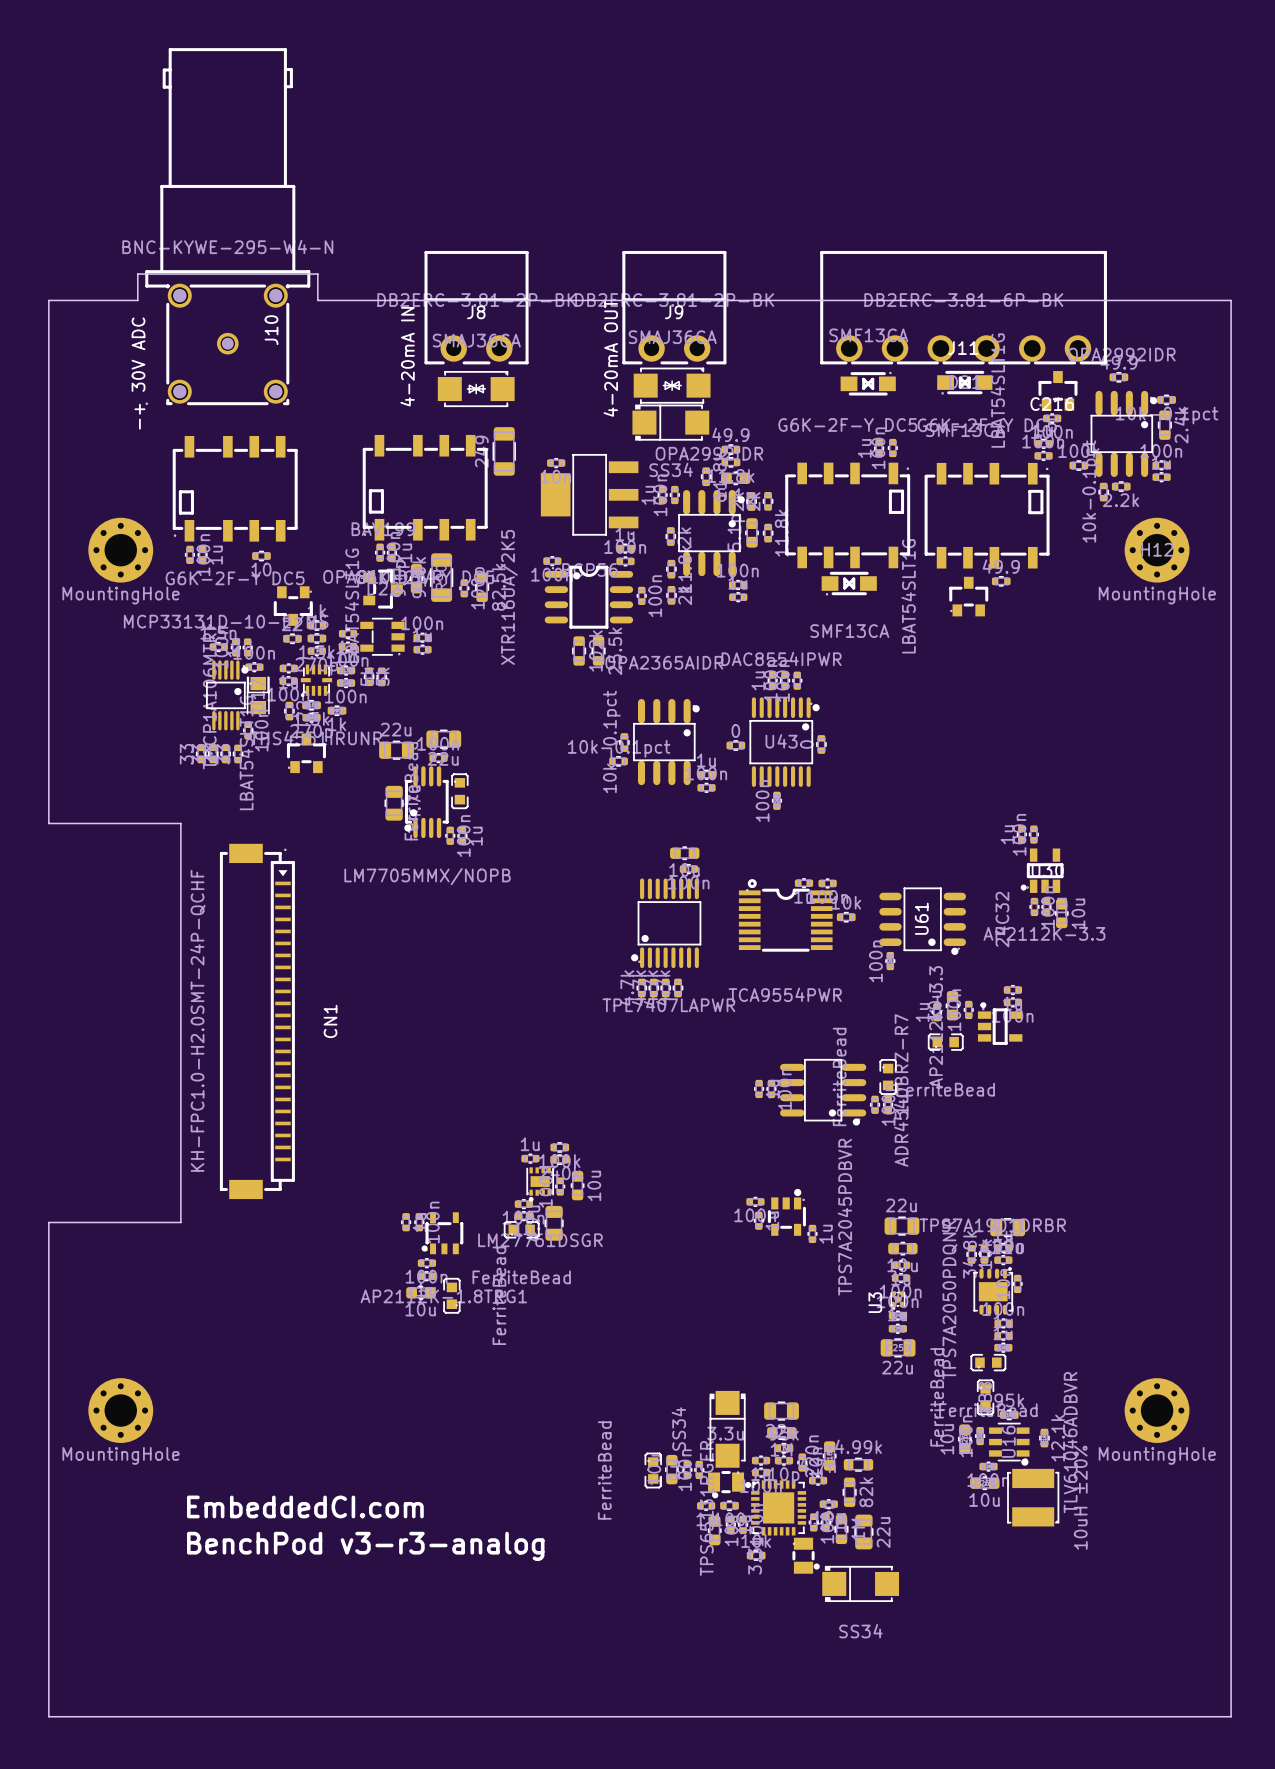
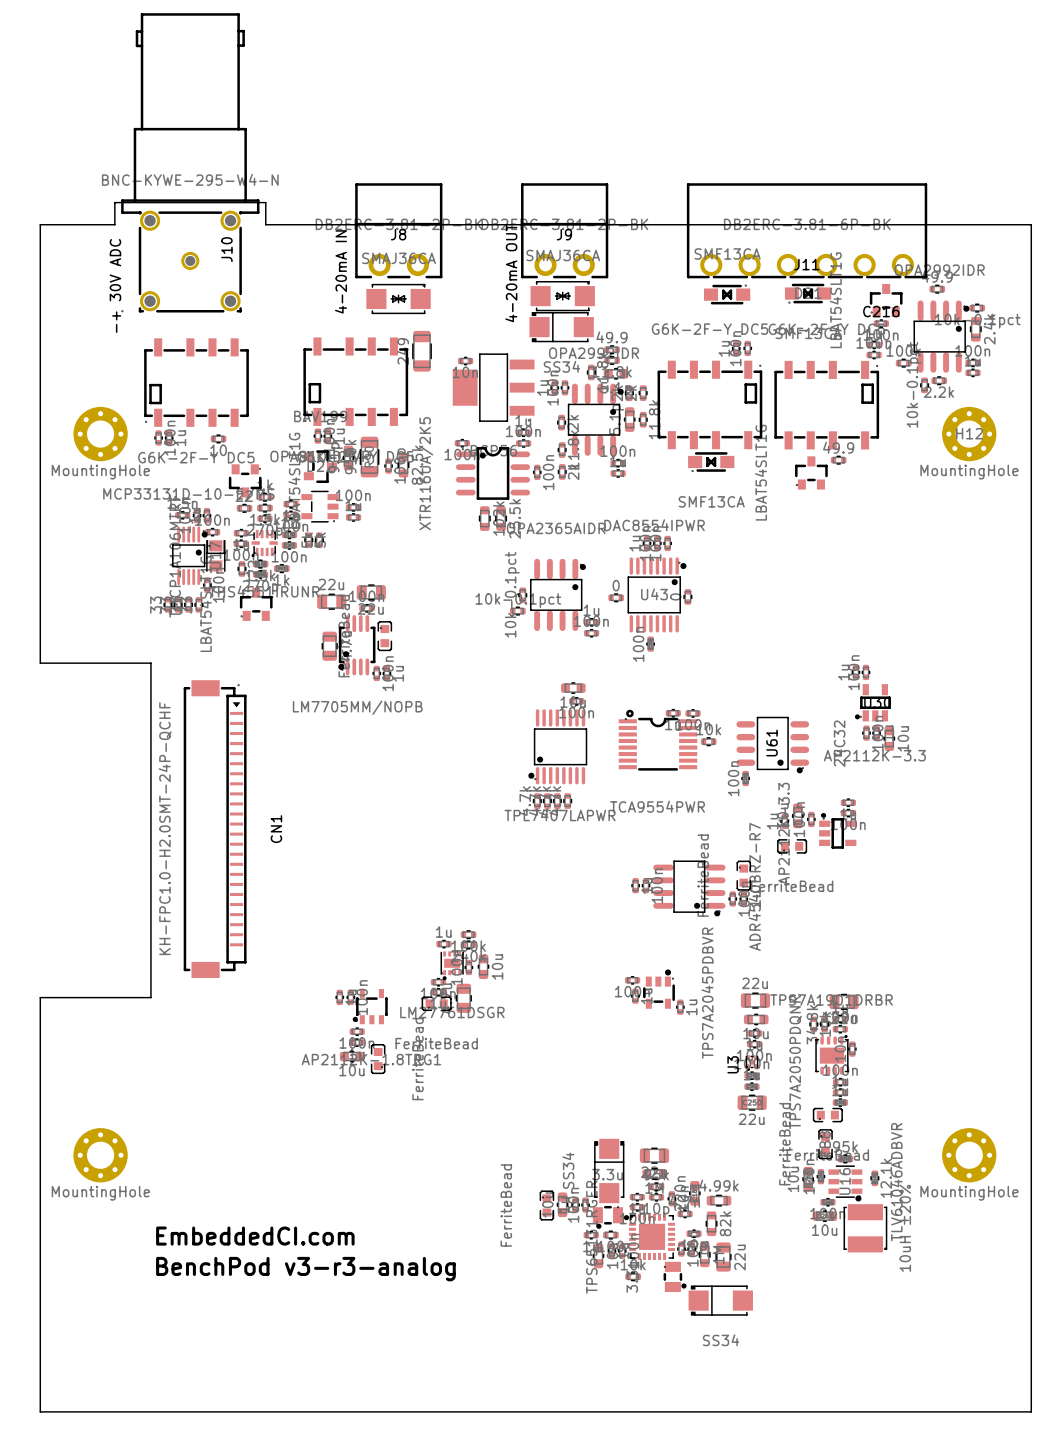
part value: LM7705MMX/NOPB (427, 876) -> LM7705MM/NOPB (357, 707)

